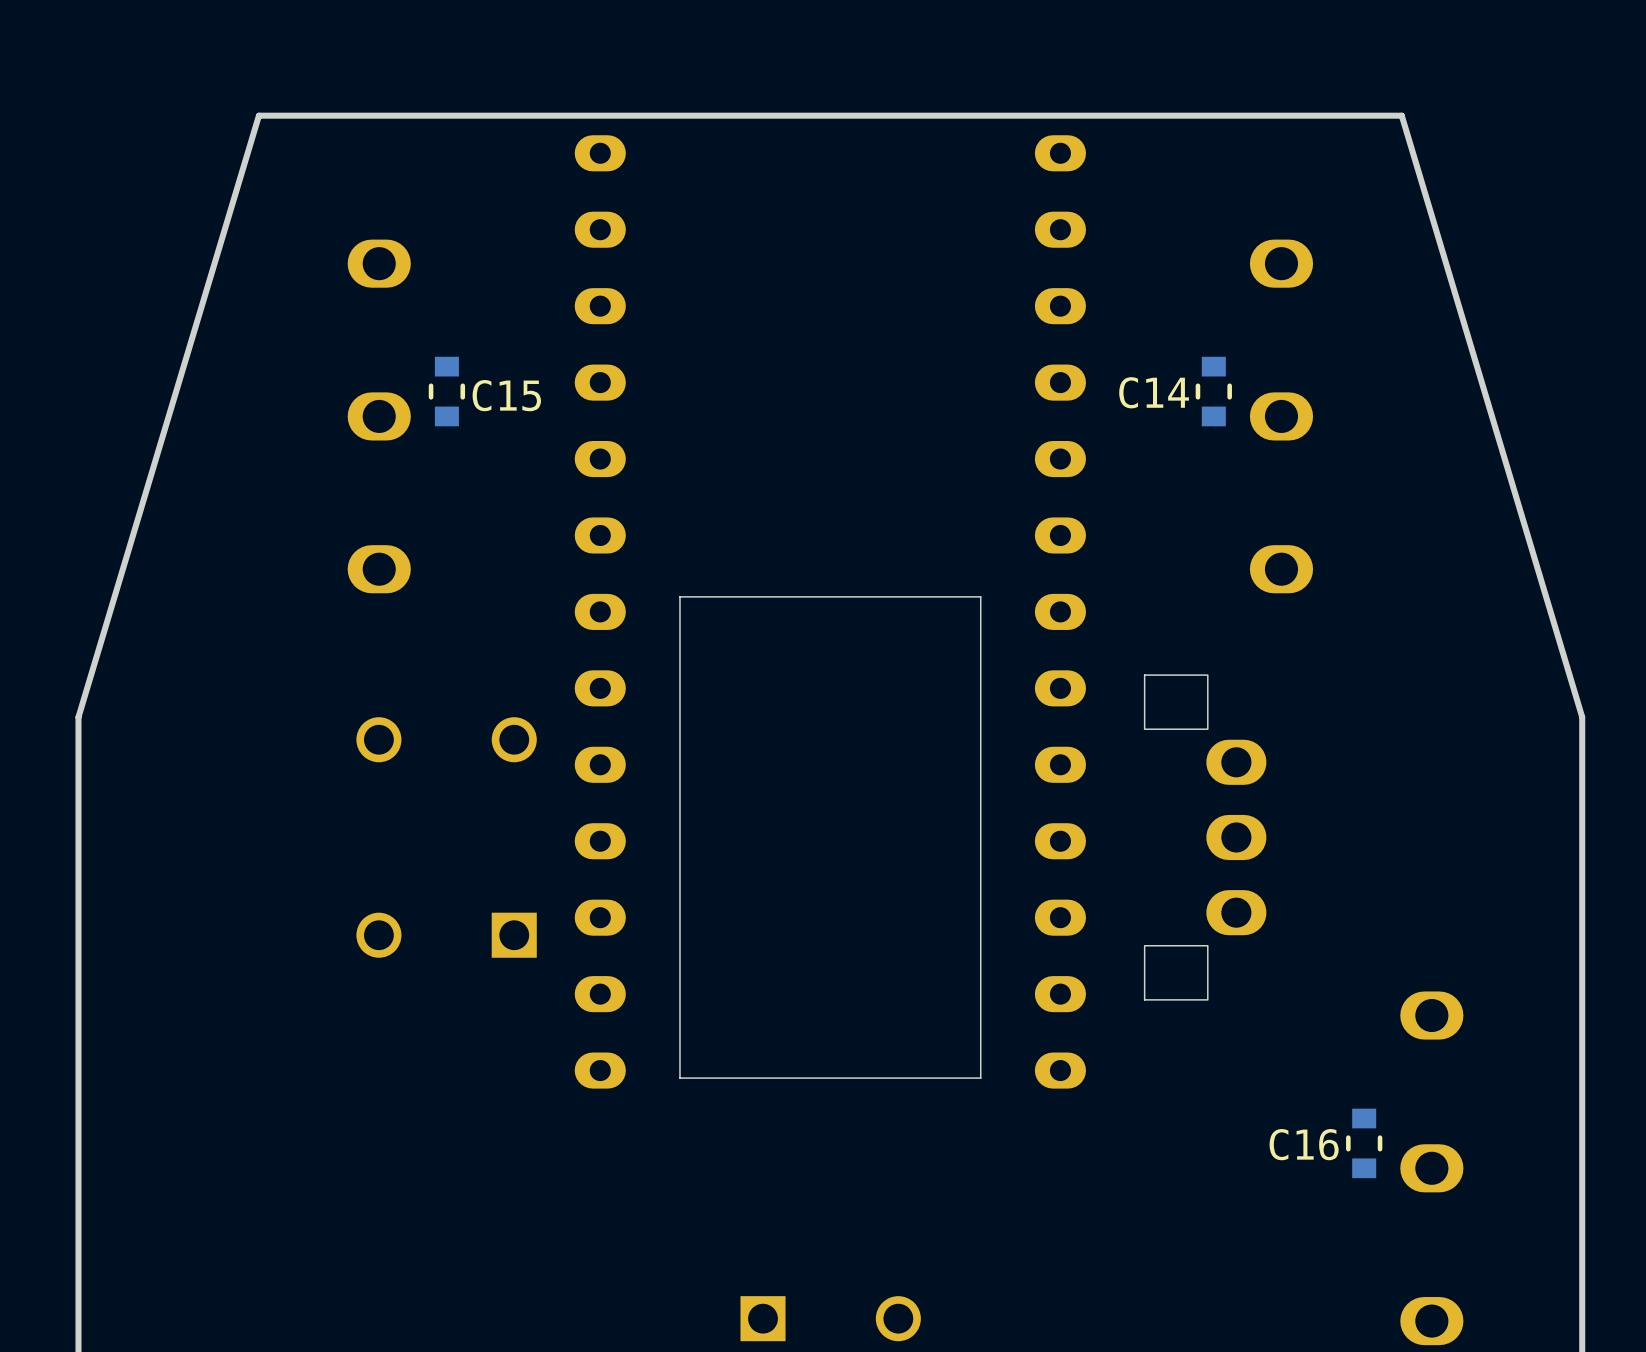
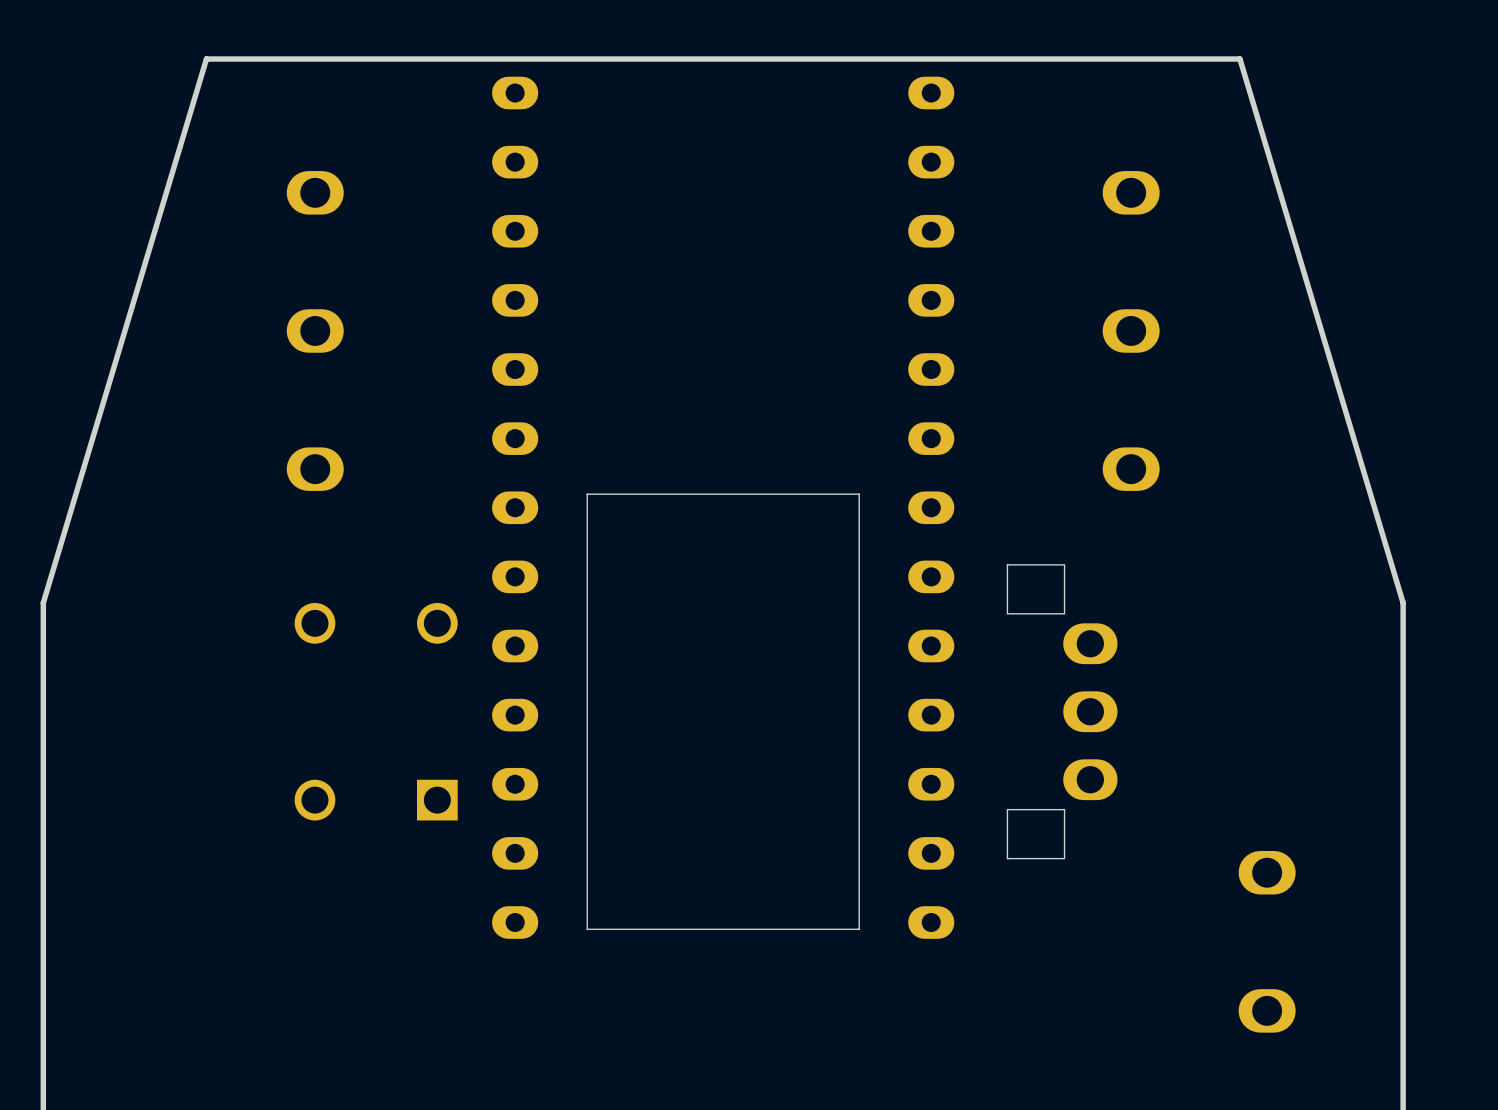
C15: (446, 391) -> none
C14: (1213, 391) -> none
C16: (1364, 1143) -> none

